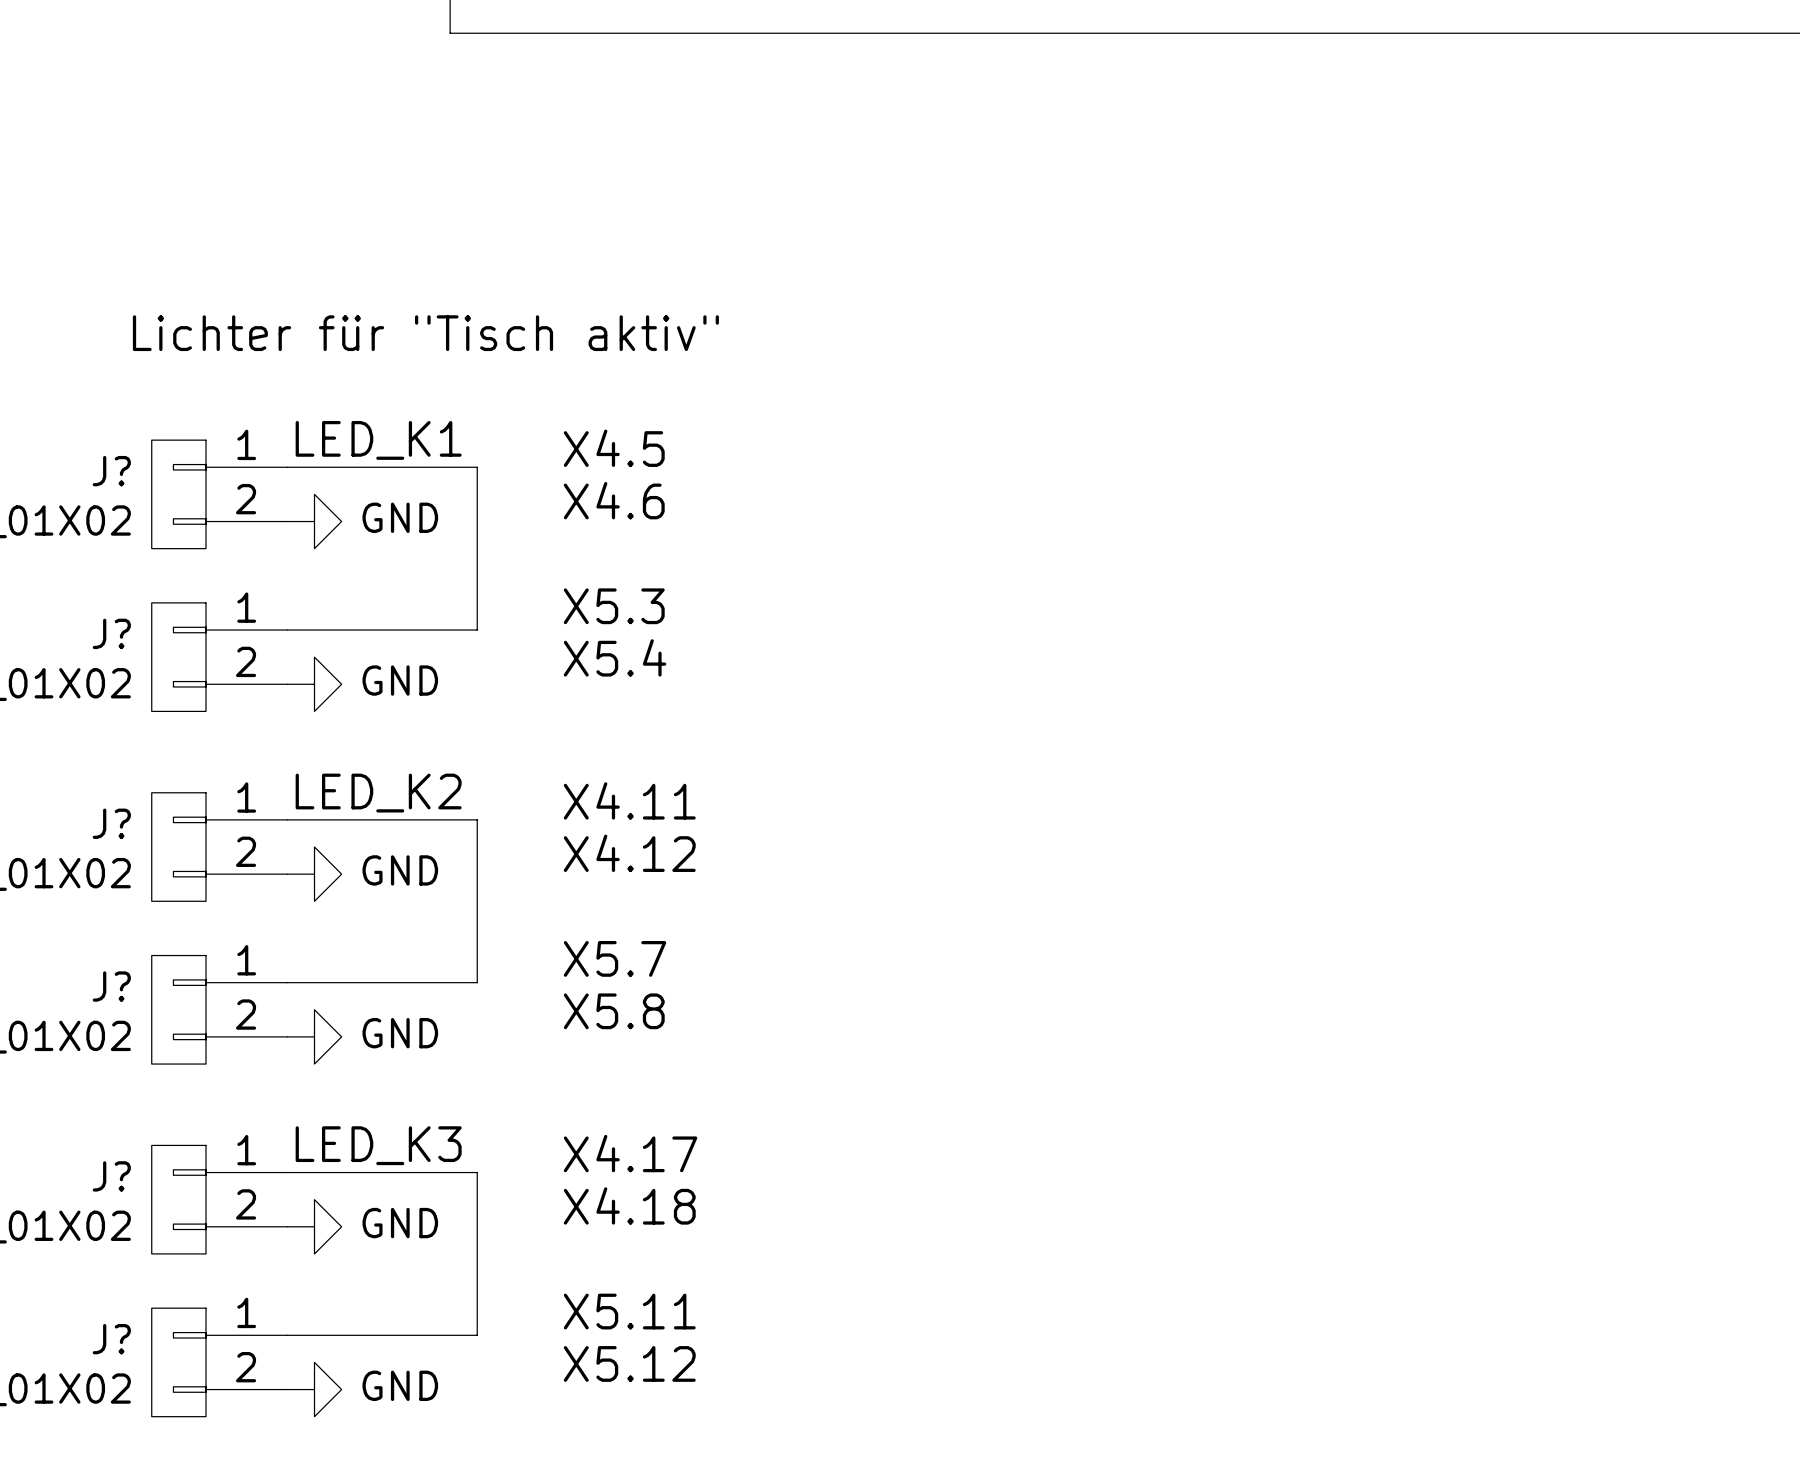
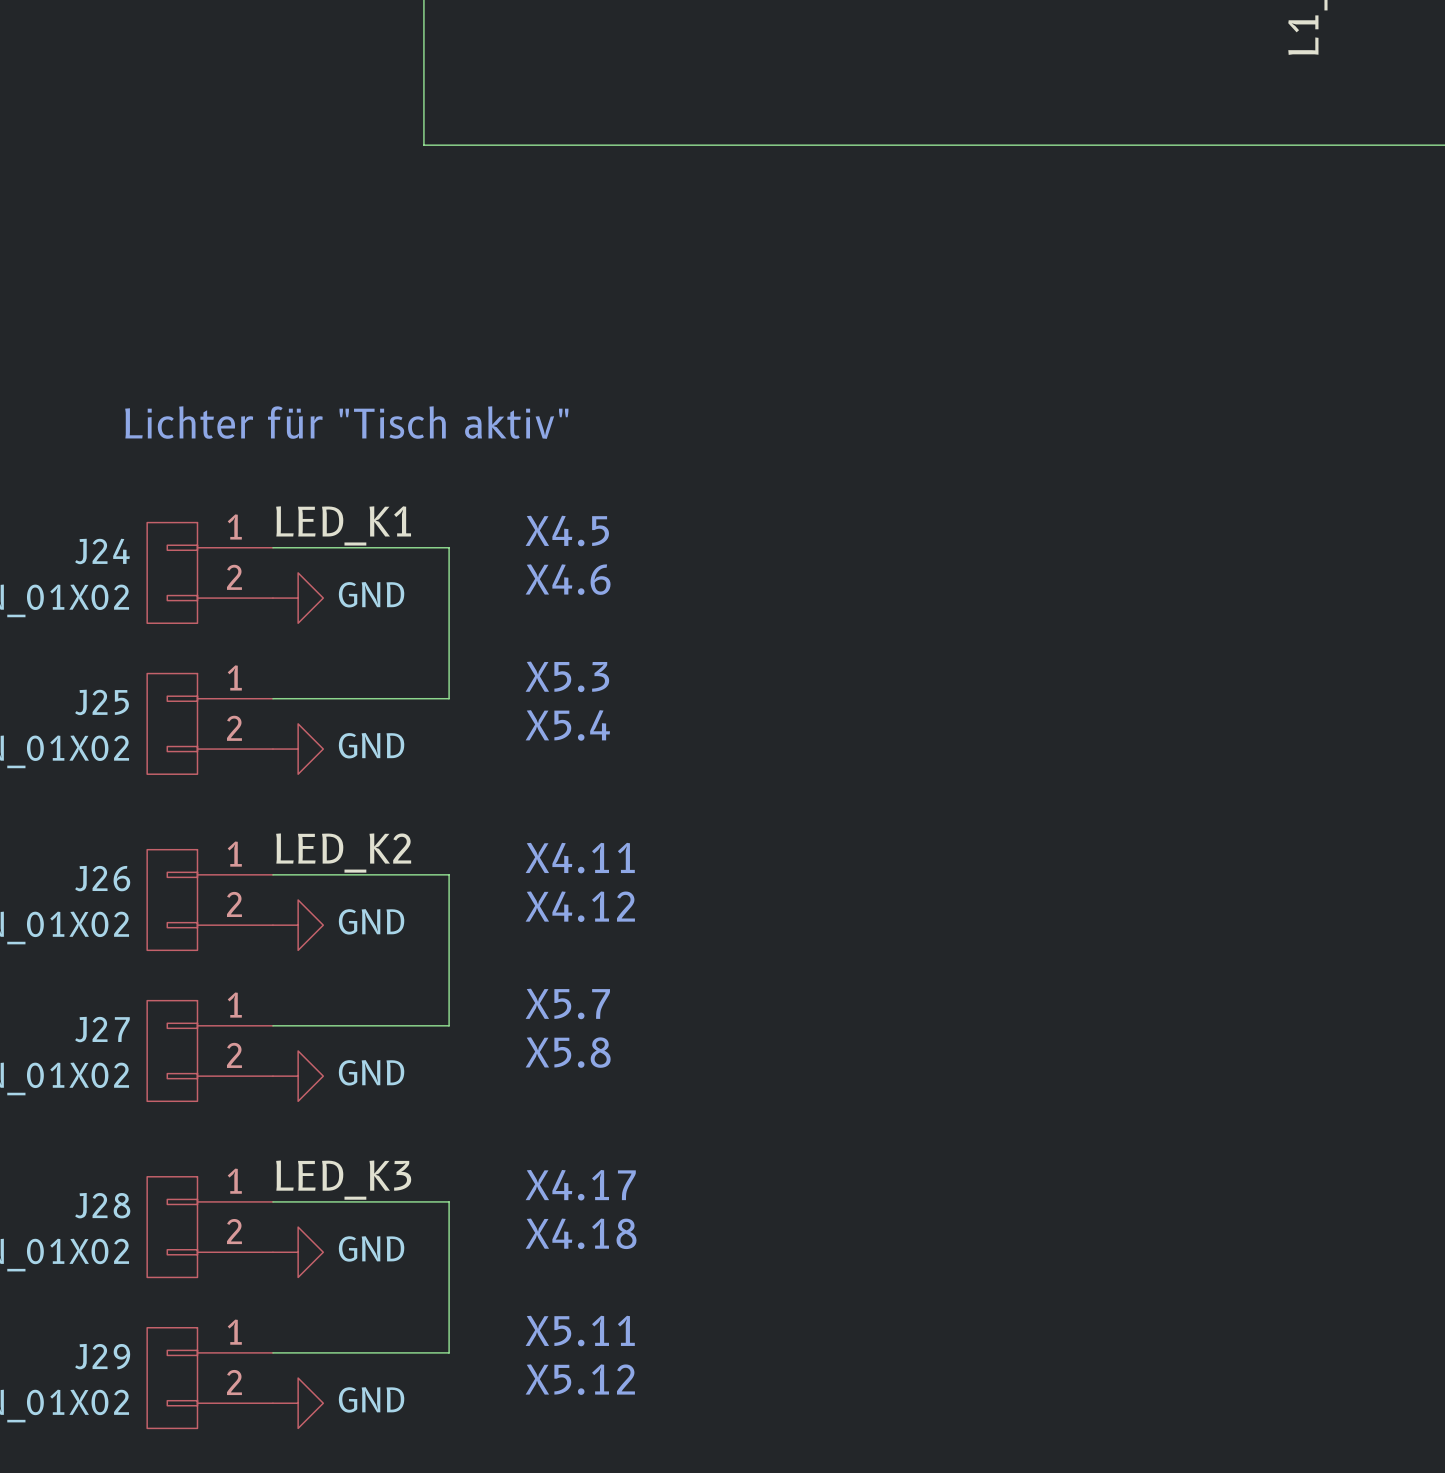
J? name: J? (111, 471) -> J24 (102, 551)
J? name: J? (111, 633) -> J25 (102, 702)
J? name: J? (111, 823) -> J26 (102, 878)
J? name: J? (111, 986) -> J27 (102, 1029)
J? name: J? (111, 1176) -> J28 (102, 1205)
J? name: J? (111, 1339) -> J29 (102, 1356)

